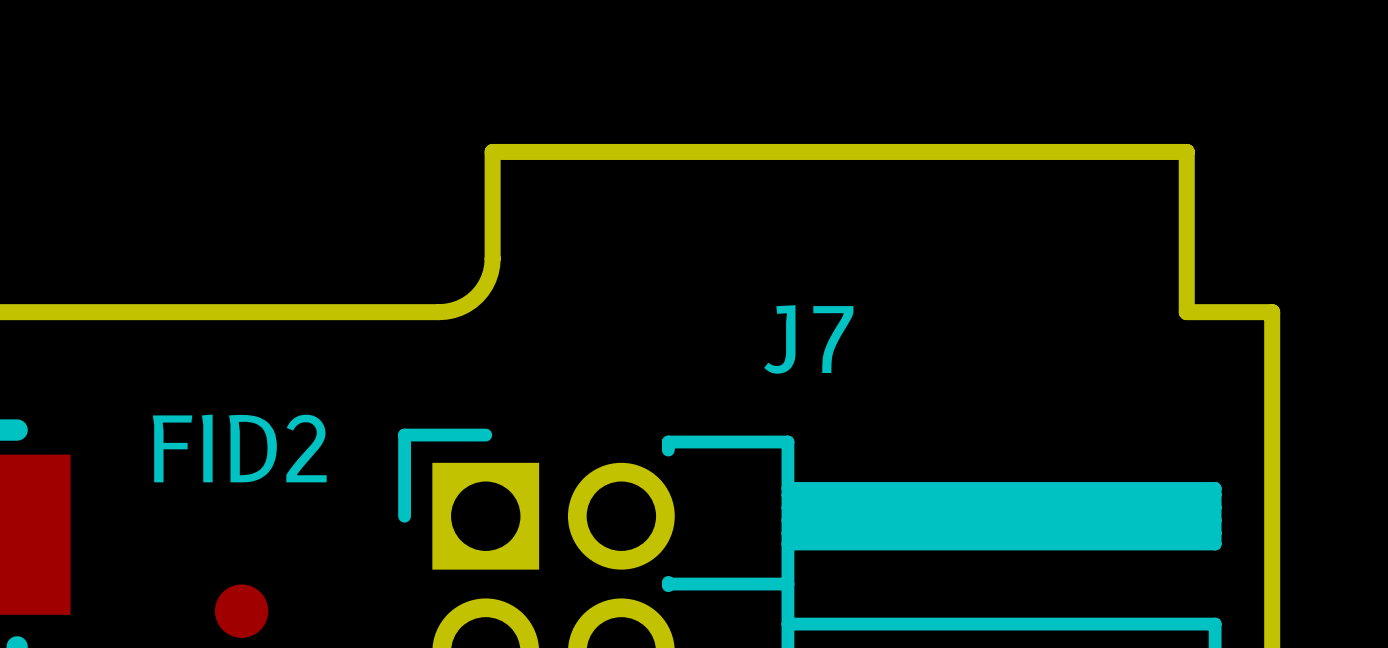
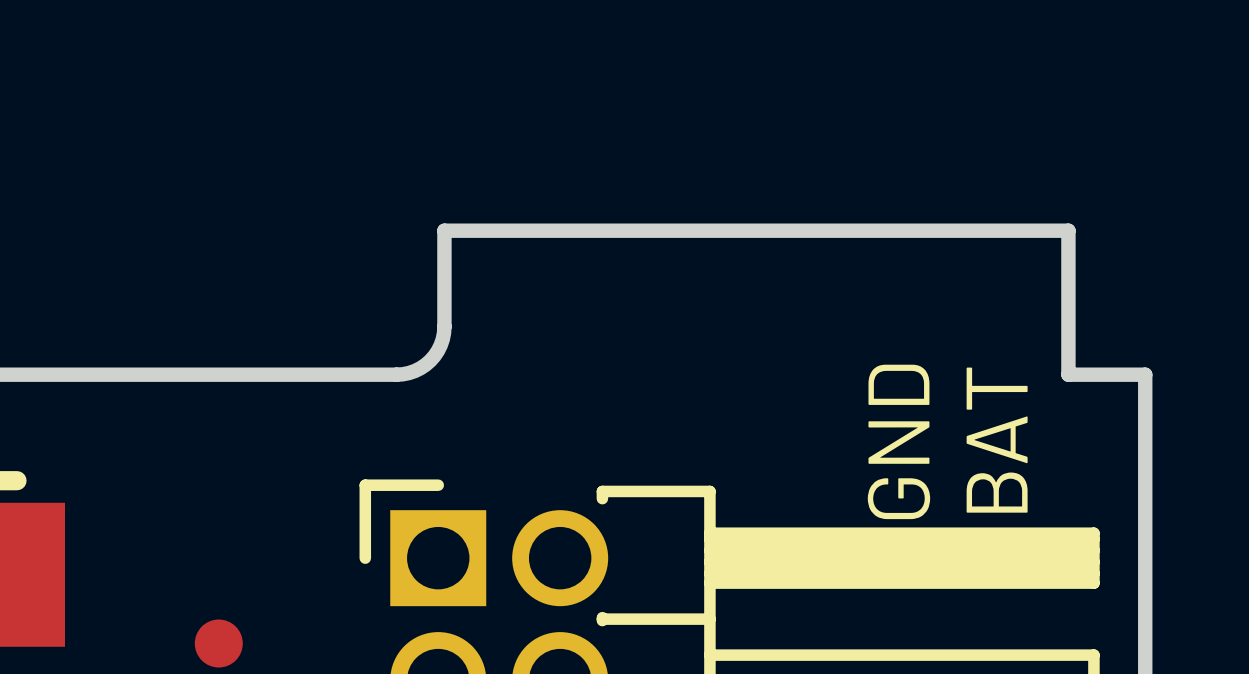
J7 name: J7 (808, 339) -> none
text: none -> BAT (997, 440)
text: none -> GND (898, 441)
FID2 name: FID2 (239, 448) -> none

